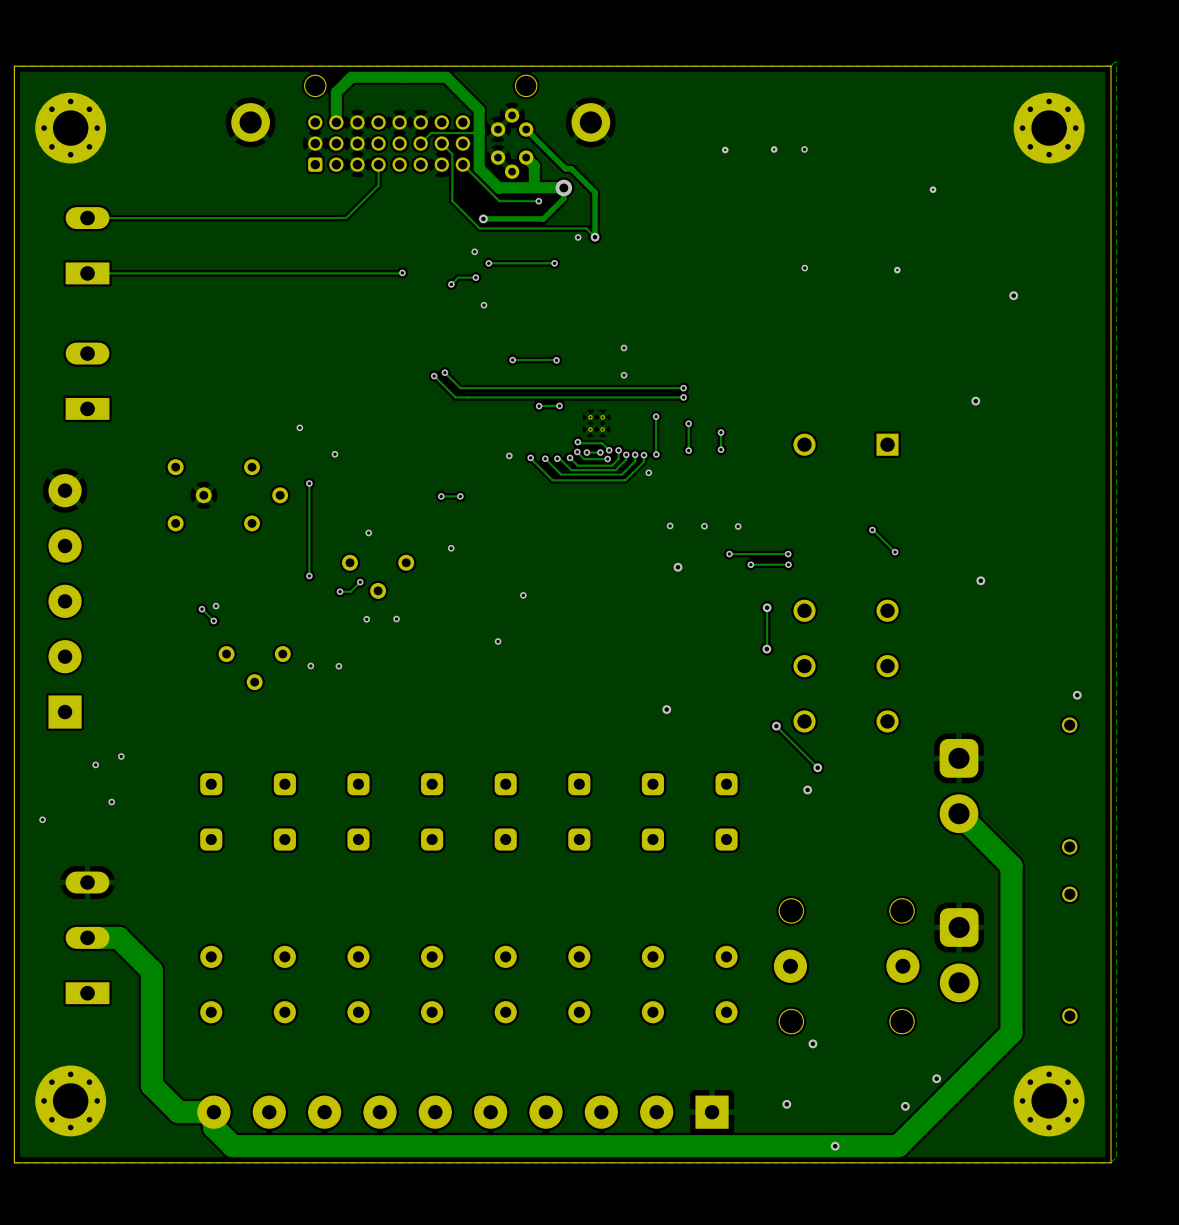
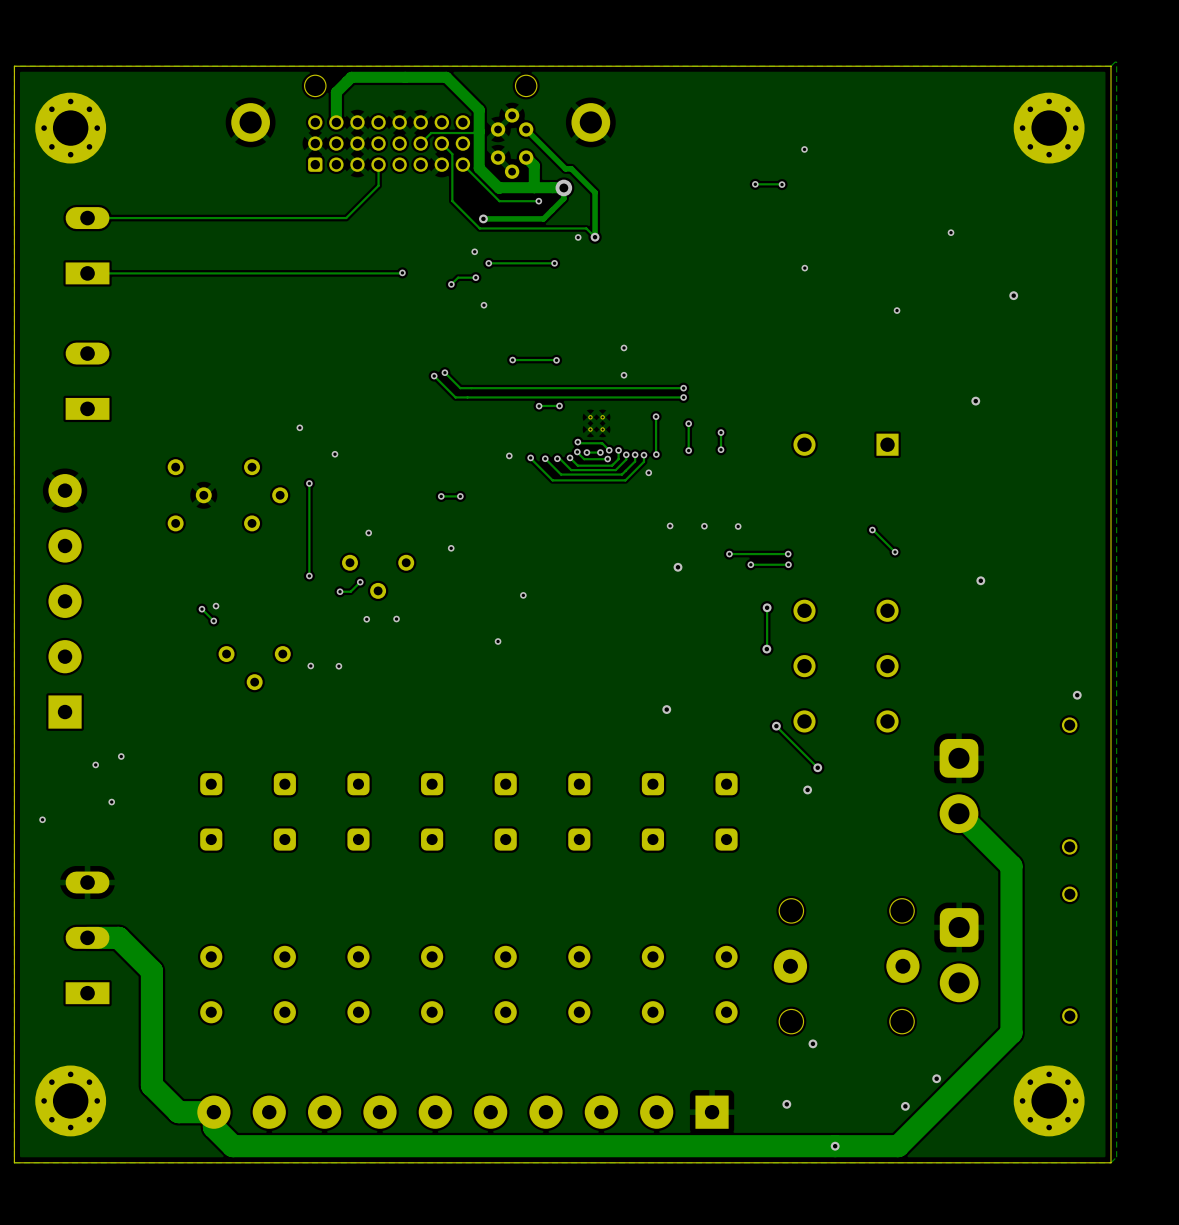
via: (774, 149) -> none
via: (725, 150) -> none
track: none -> (755, 184) (782, 184)
via: none -> (755, 184)
via: none -> (782, 184)
via: (933, 189) -> none
via: none -> (951, 232)
via: (897, 270) -> none
via: none -> (897, 310)

